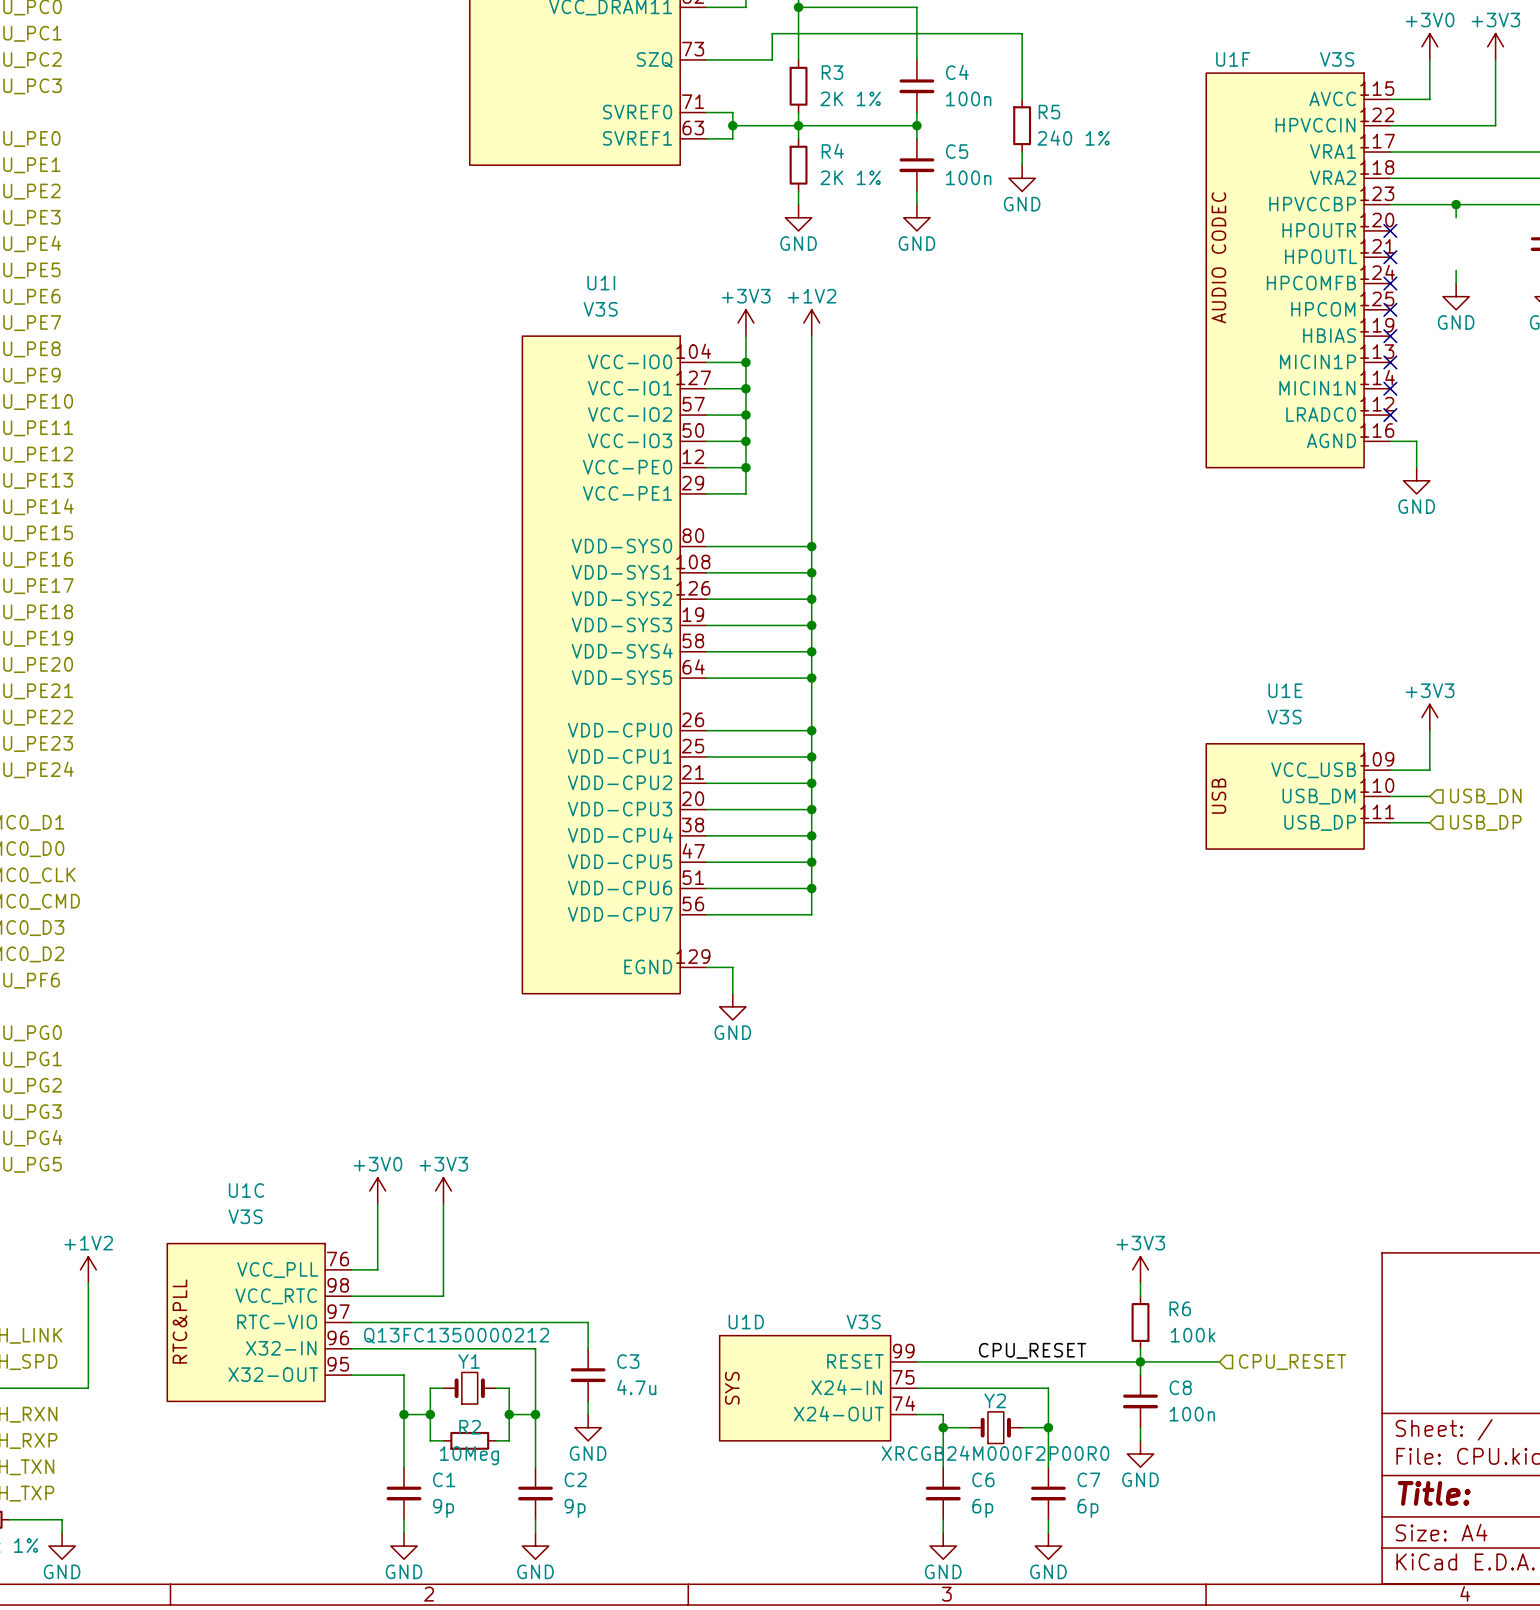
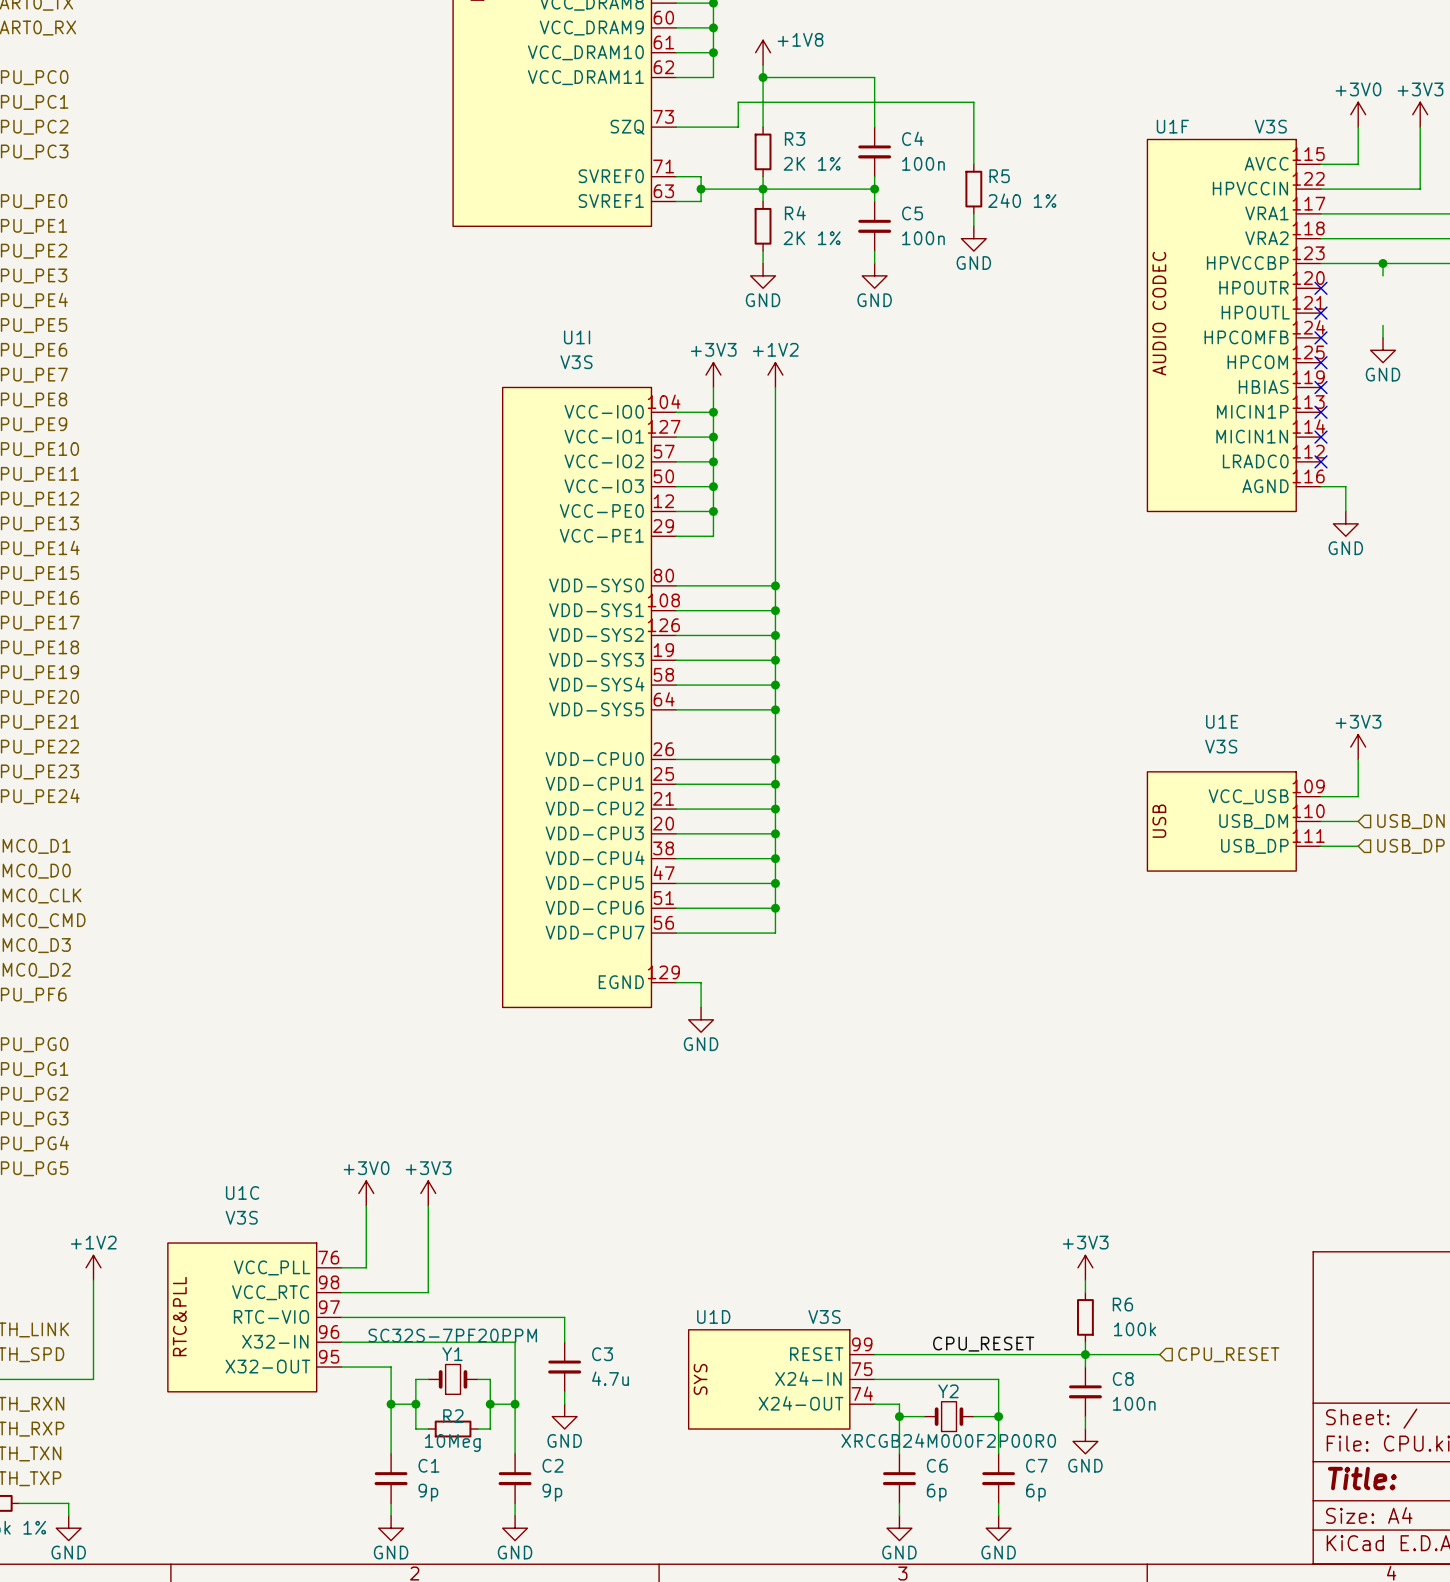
Y1 value: Q13FC1350000212 (456, 1335) -> SC32S-7PF20PPM (452, 1335)

